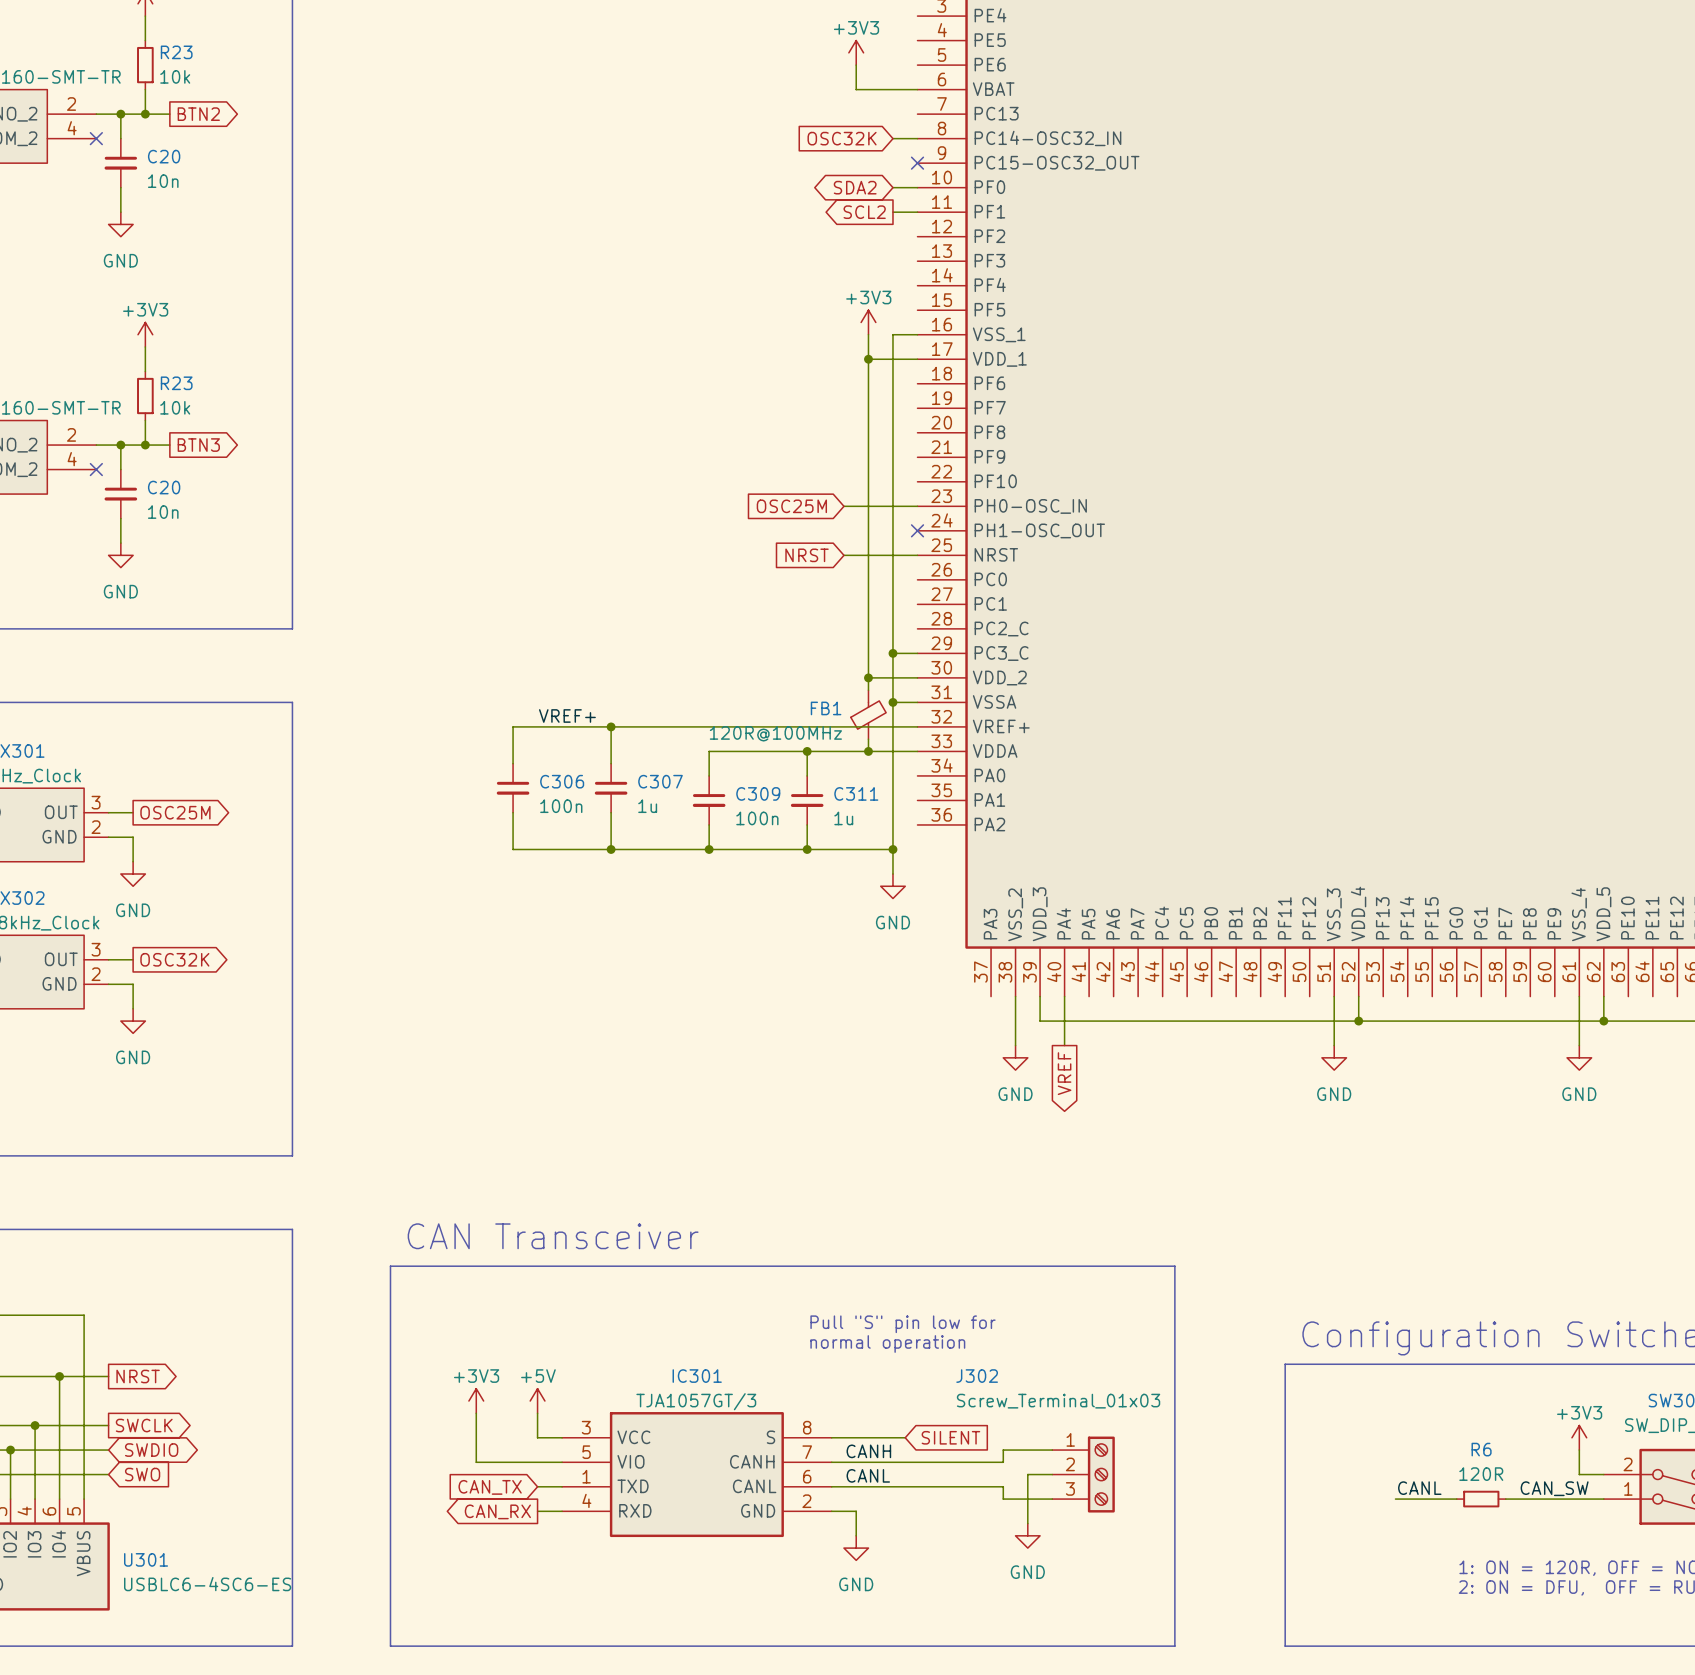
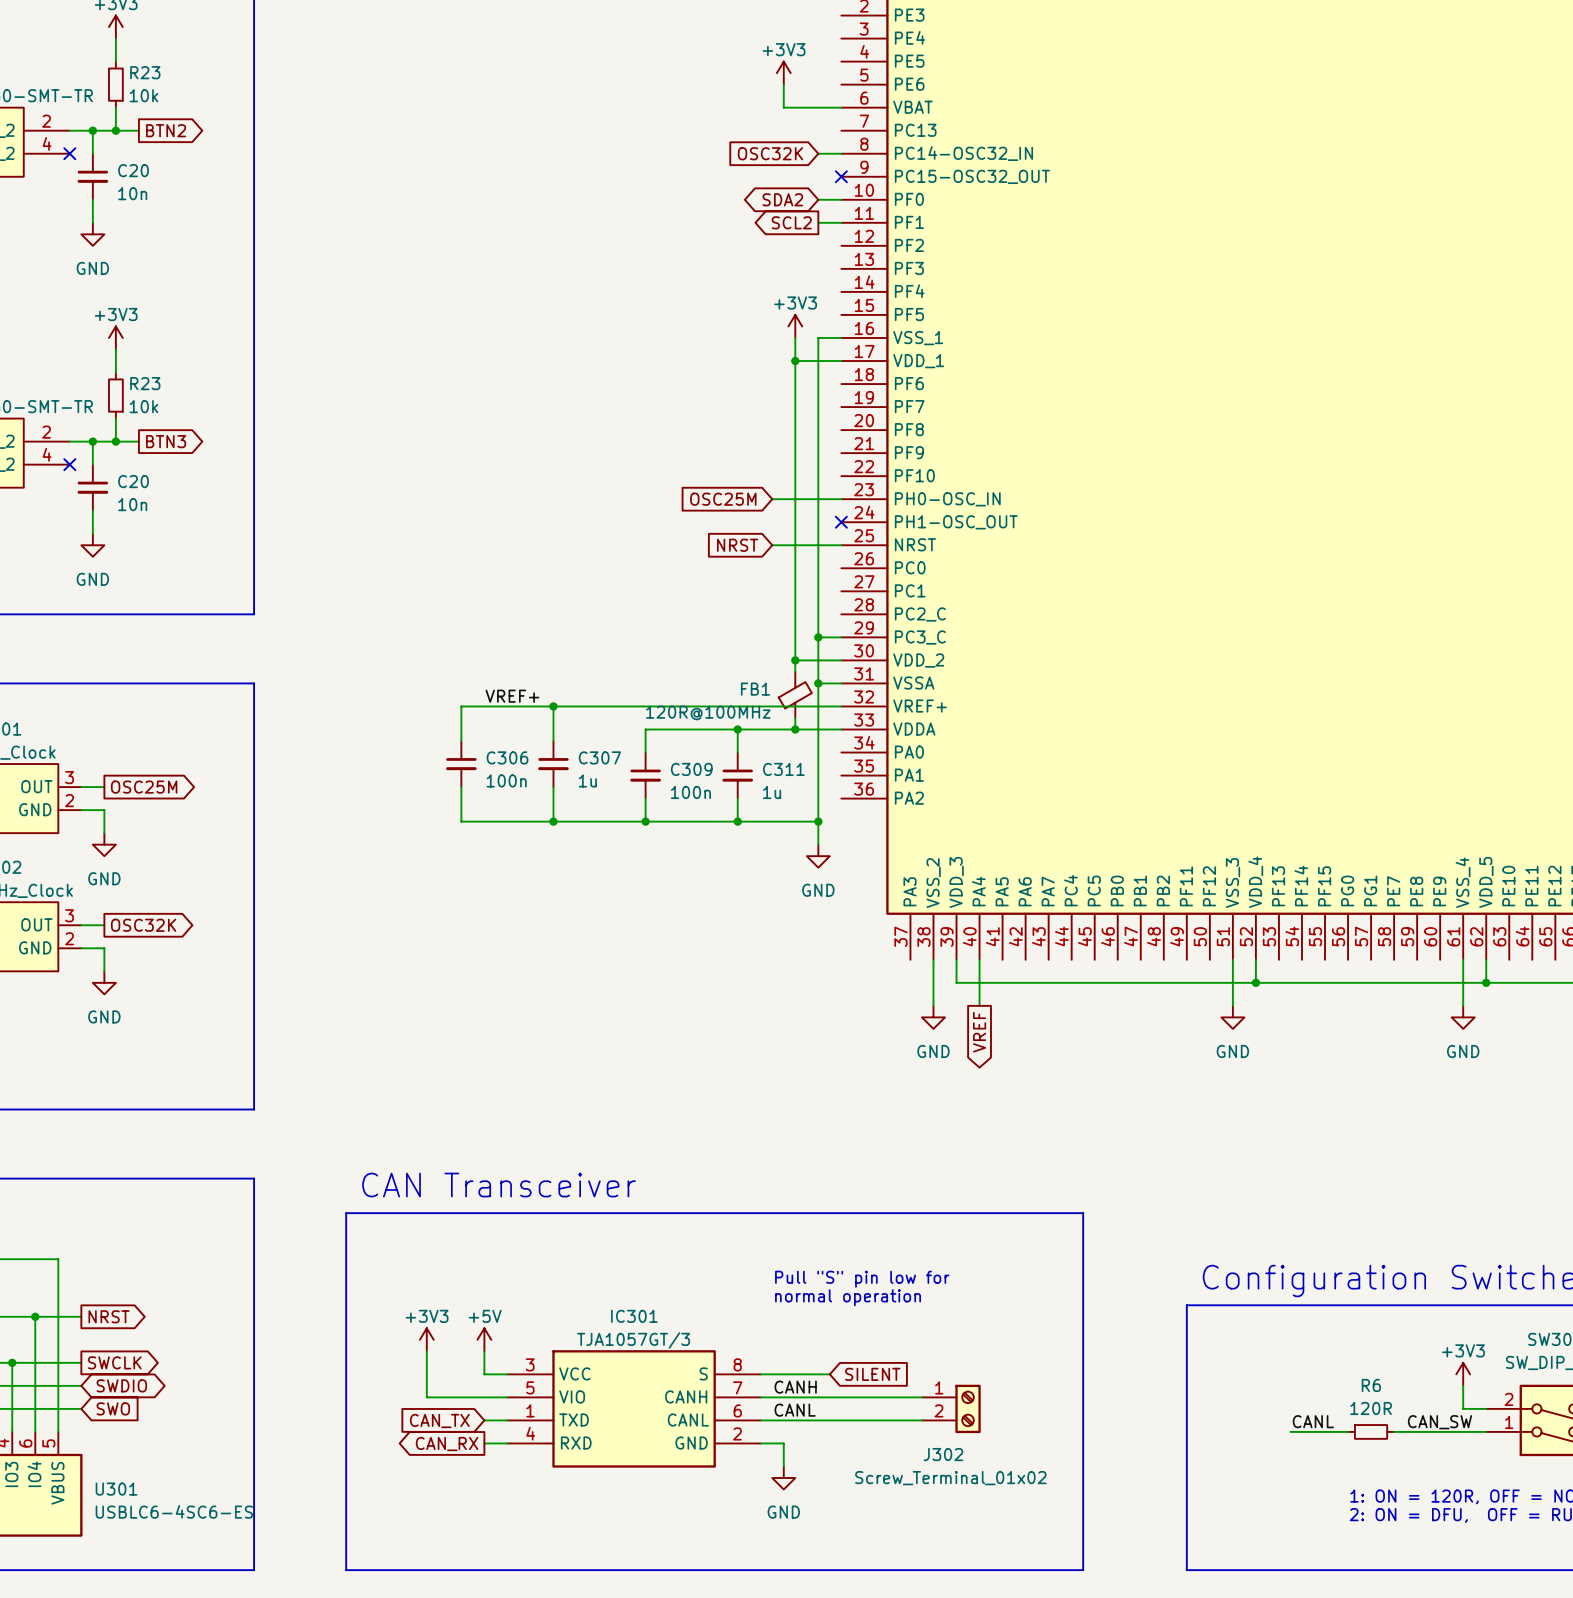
text position: Pull "S" pin low for (903, 1324) -> Pull "S" pin low for (862, 1279)
text position: normal operation (887, 1343) -> normal operation (848, 1297)
J302 name position: J302 (977, 1376) -> J302 (943, 1454)
J302 value: Screw_Terminal_01x03 (1058, 1401) -> Screw_Terminal_01x02 (950, 1478)
J302 symbol: [1052, 1436, 1115, 1513] -> [921, 1384, 981, 1434]
wire: (1052, 1450) (1003, 1450) (1003, 1462) -> none
wire: (1052, 1474) (1027, 1474) (1027, 1523) -> none
wire: (1003, 1486) (1003, 1499) (1052, 1499) -> none
power symbol: GND (1027, 1535) -> none

